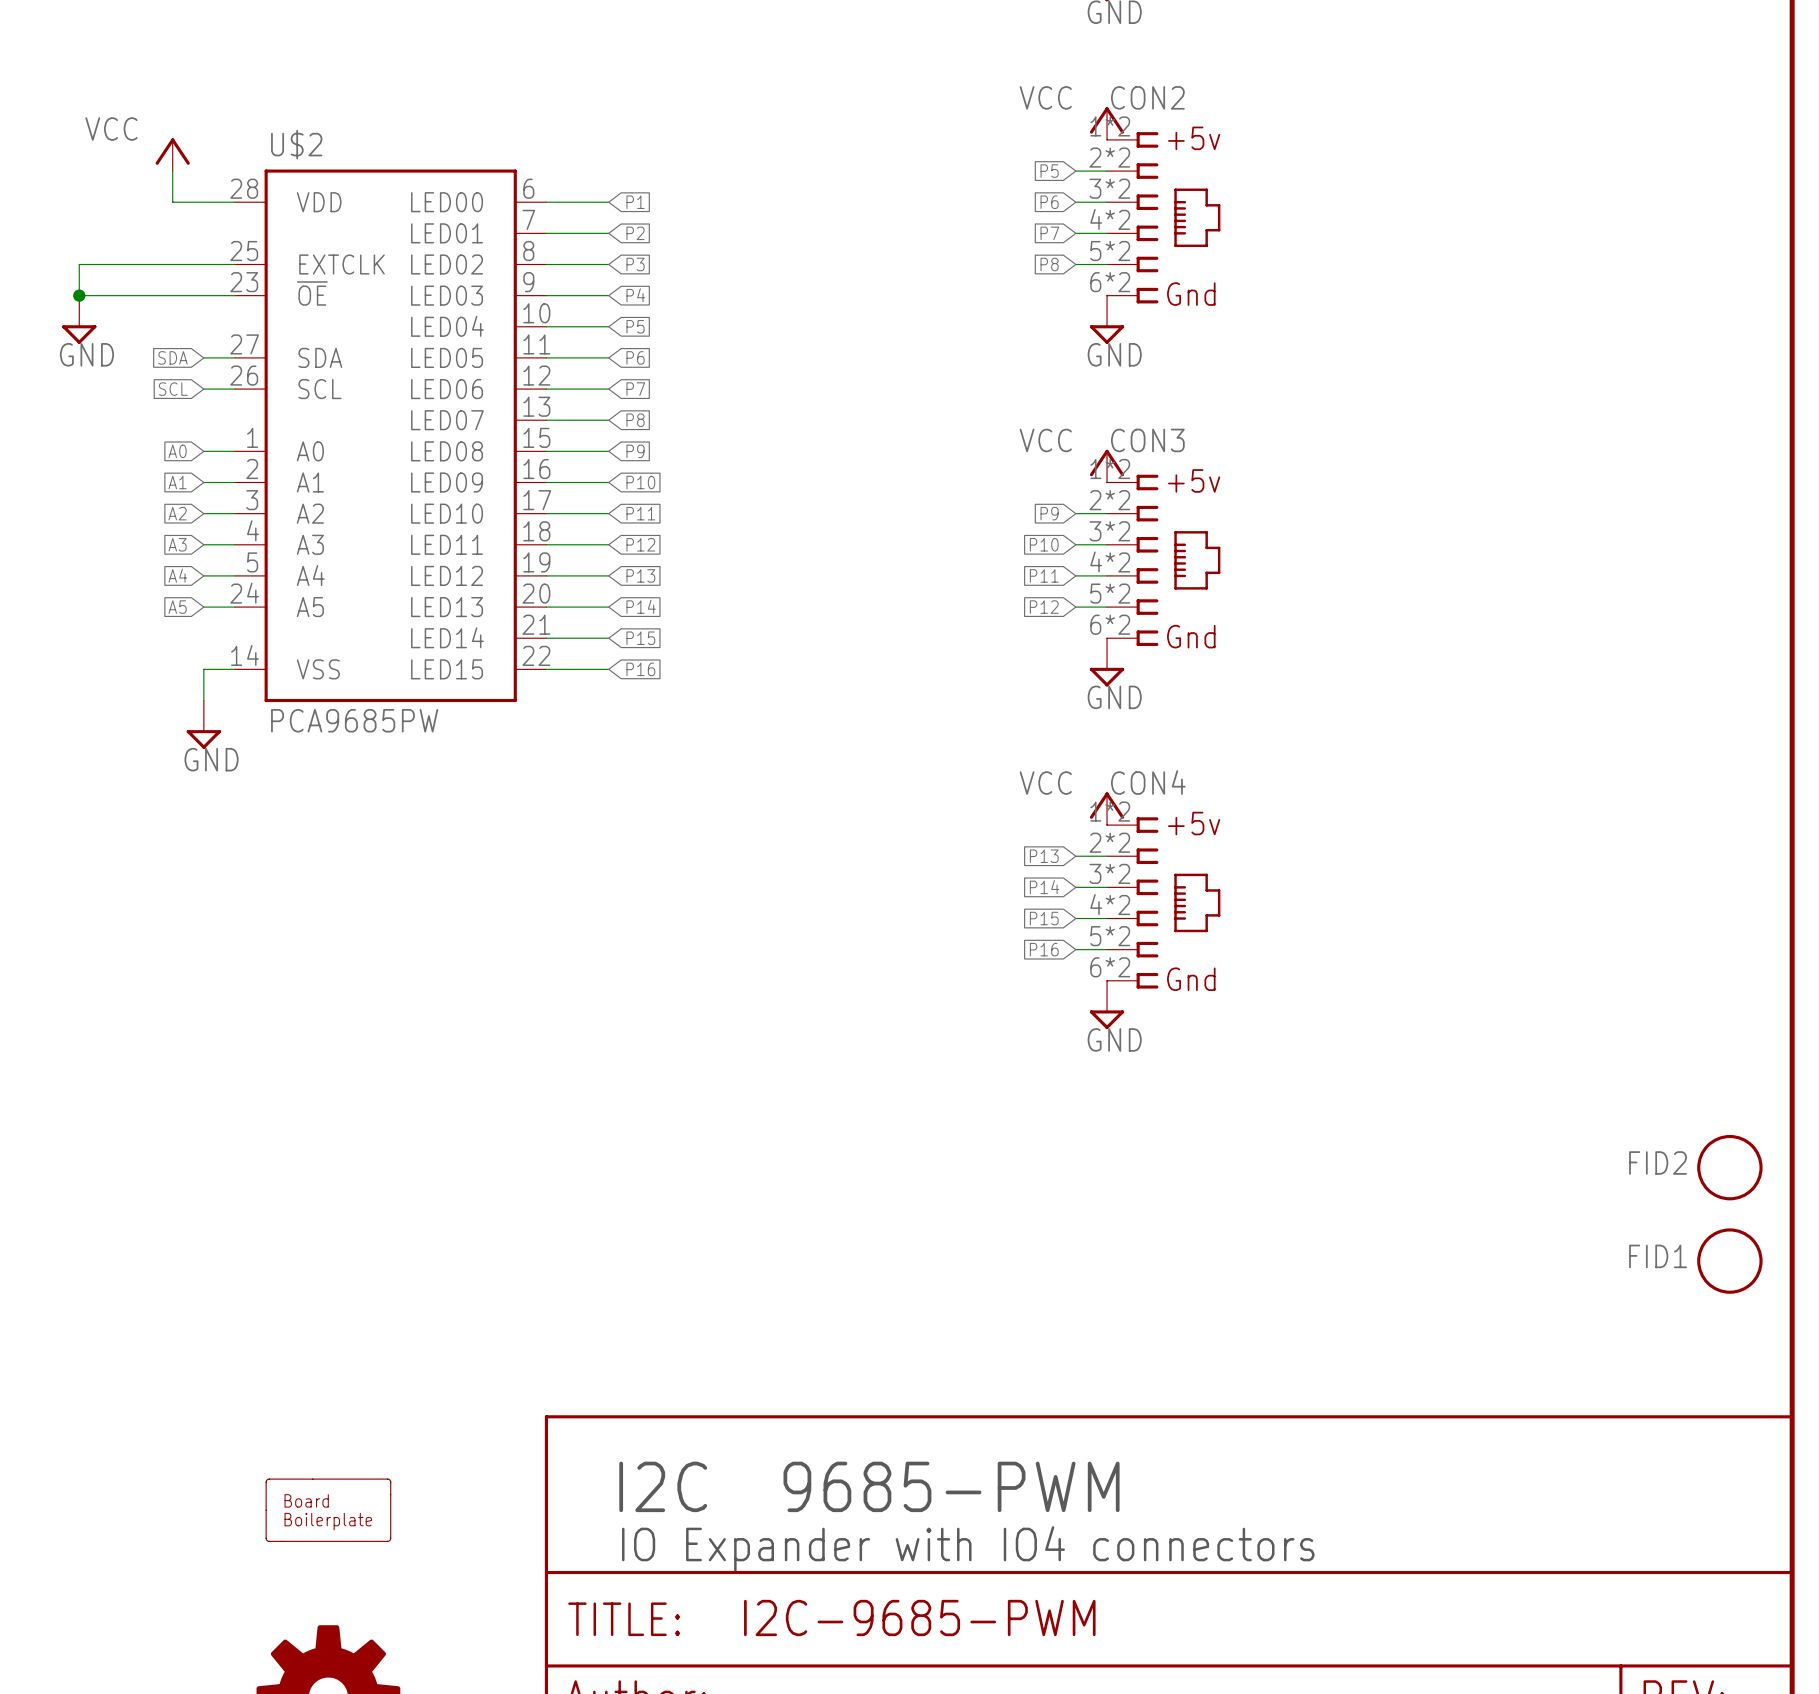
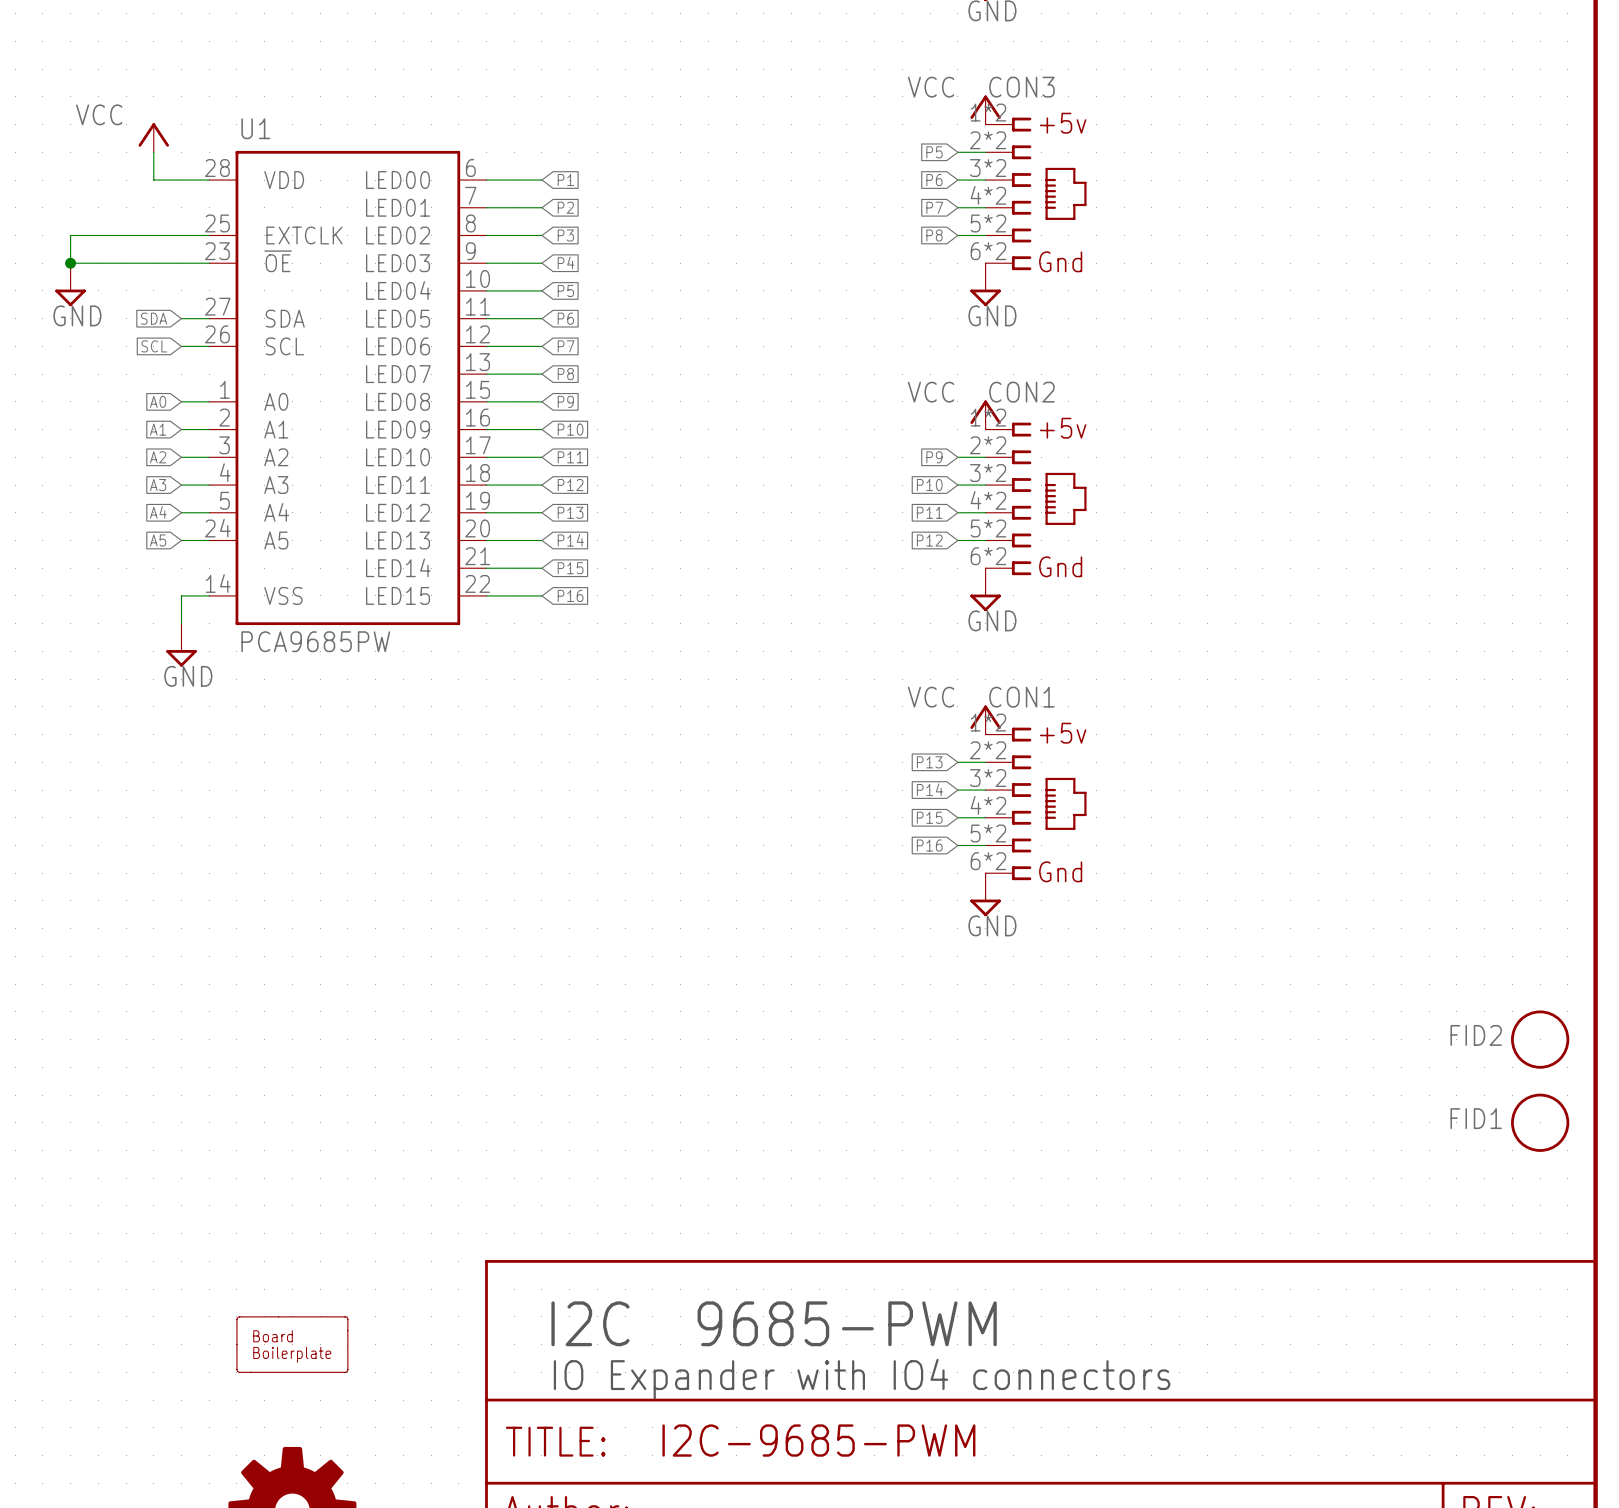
CON2 name: CON2 (1147, 97) -> CON3 (1021, 87)
U$2 name: U$2 (296, 144) -> U1 (255, 128)
CON3 name: CON3 (1147, 440) -> CON2 (1021, 392)
CON4 name: CON4 (1148, 782) -> CON1 (1021, 697)

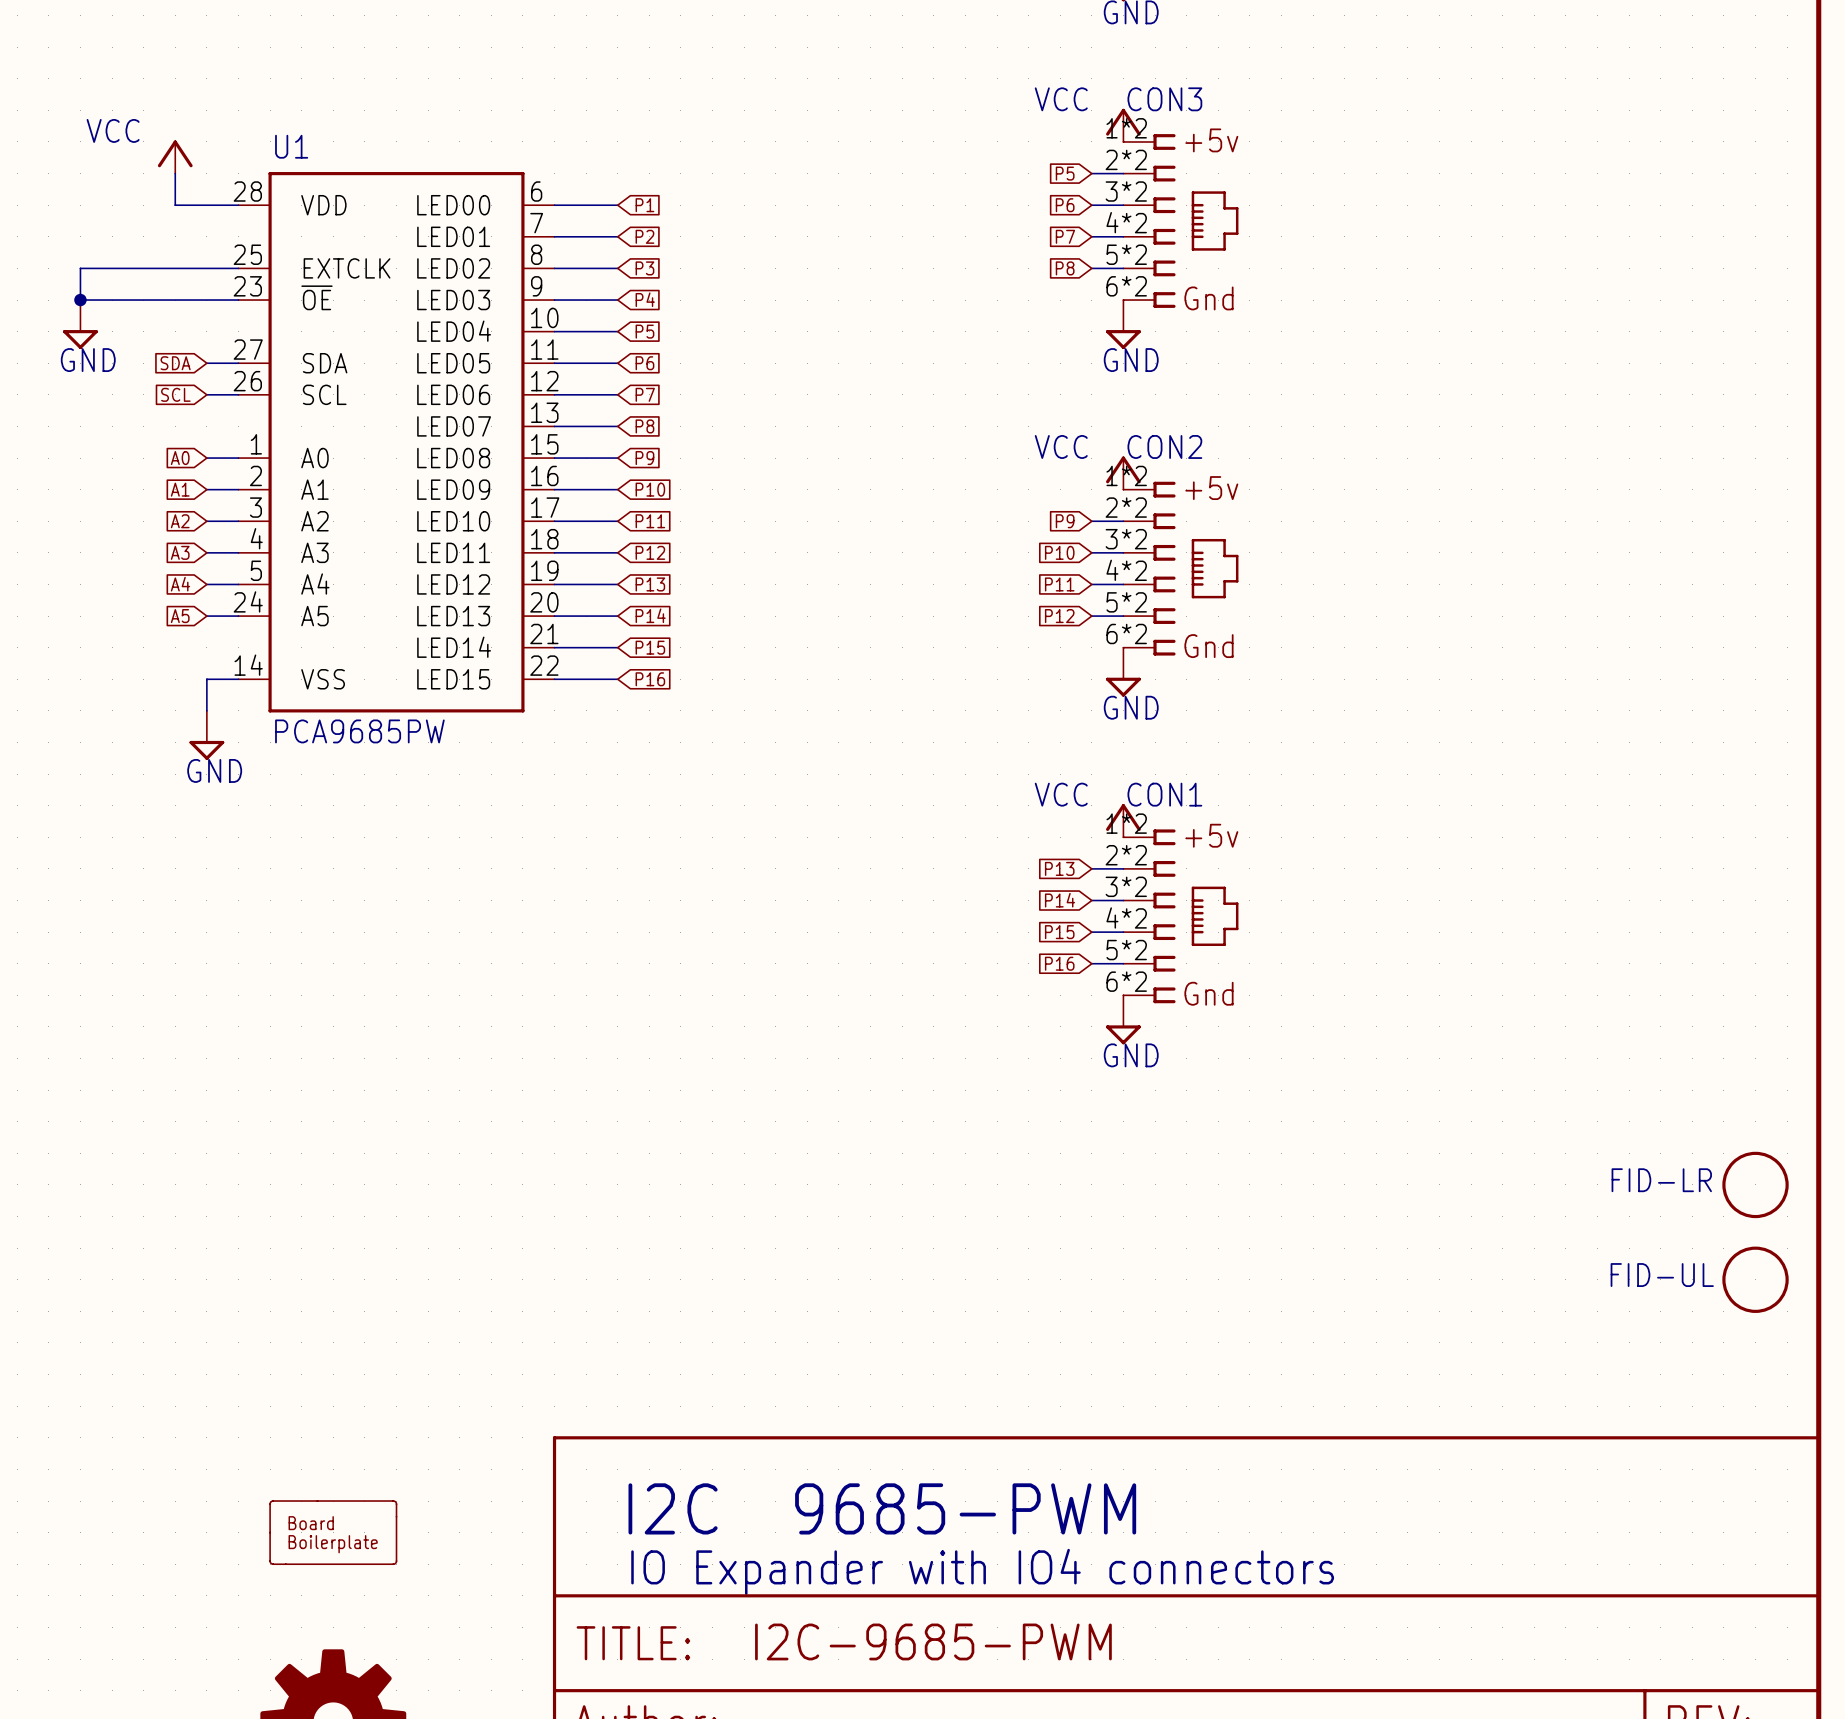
FID2 name: FID2 (1476, 1035) -> FID-LR (1661, 1180)
FID1 name: FID1 (1476, 1118) -> FID-UL (1662, 1275)

